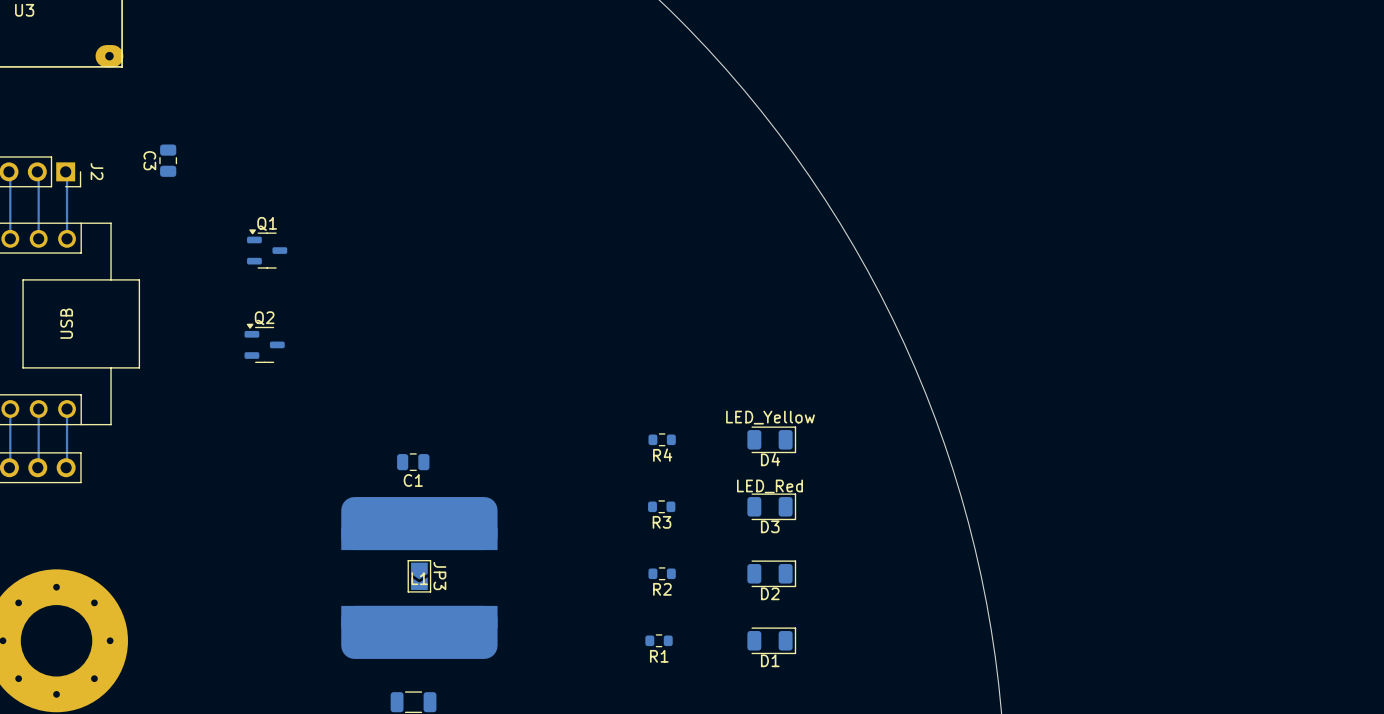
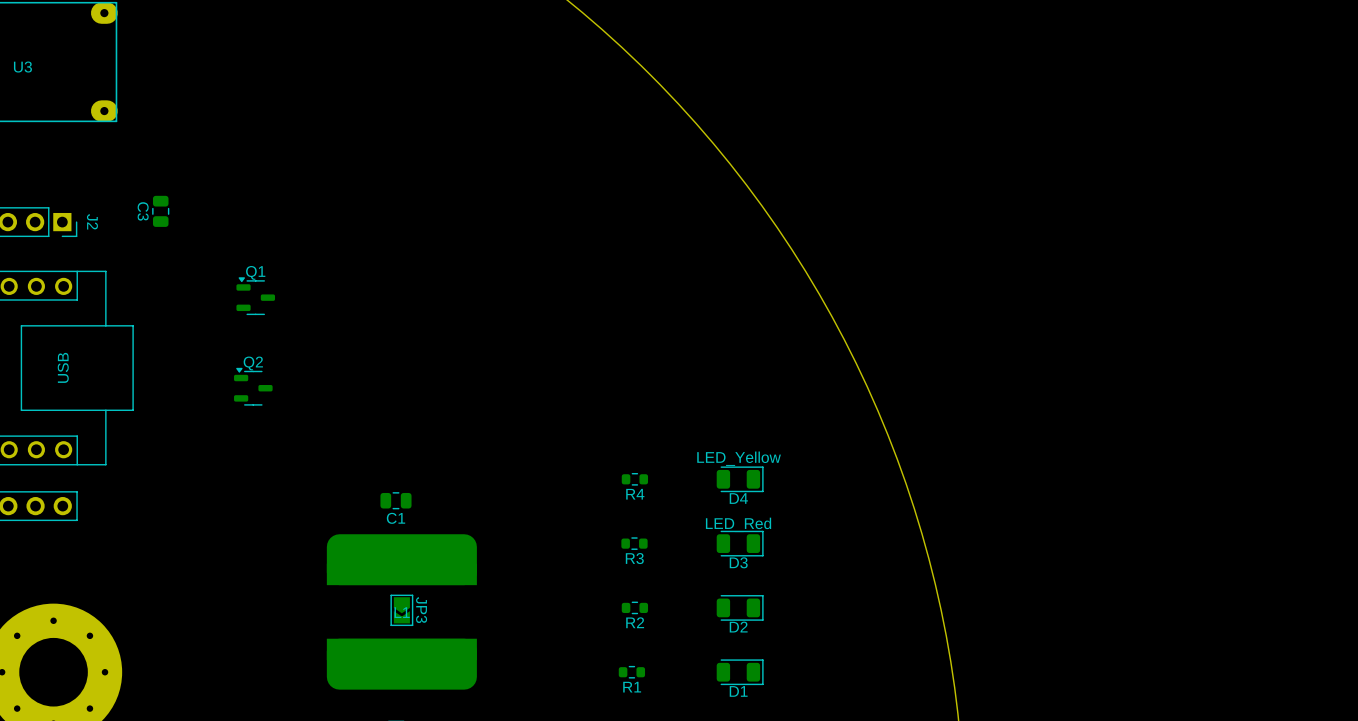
track: (8, 171) (10, 238) -> none
track: (37, 171) (38, 238) -> none
track: (65, 171) (67, 238) -> none
track: (10, 409) (9, 467) -> none
track: (38, 409) (37, 467) -> none
track: (67, 409) (66, 467) -> none

